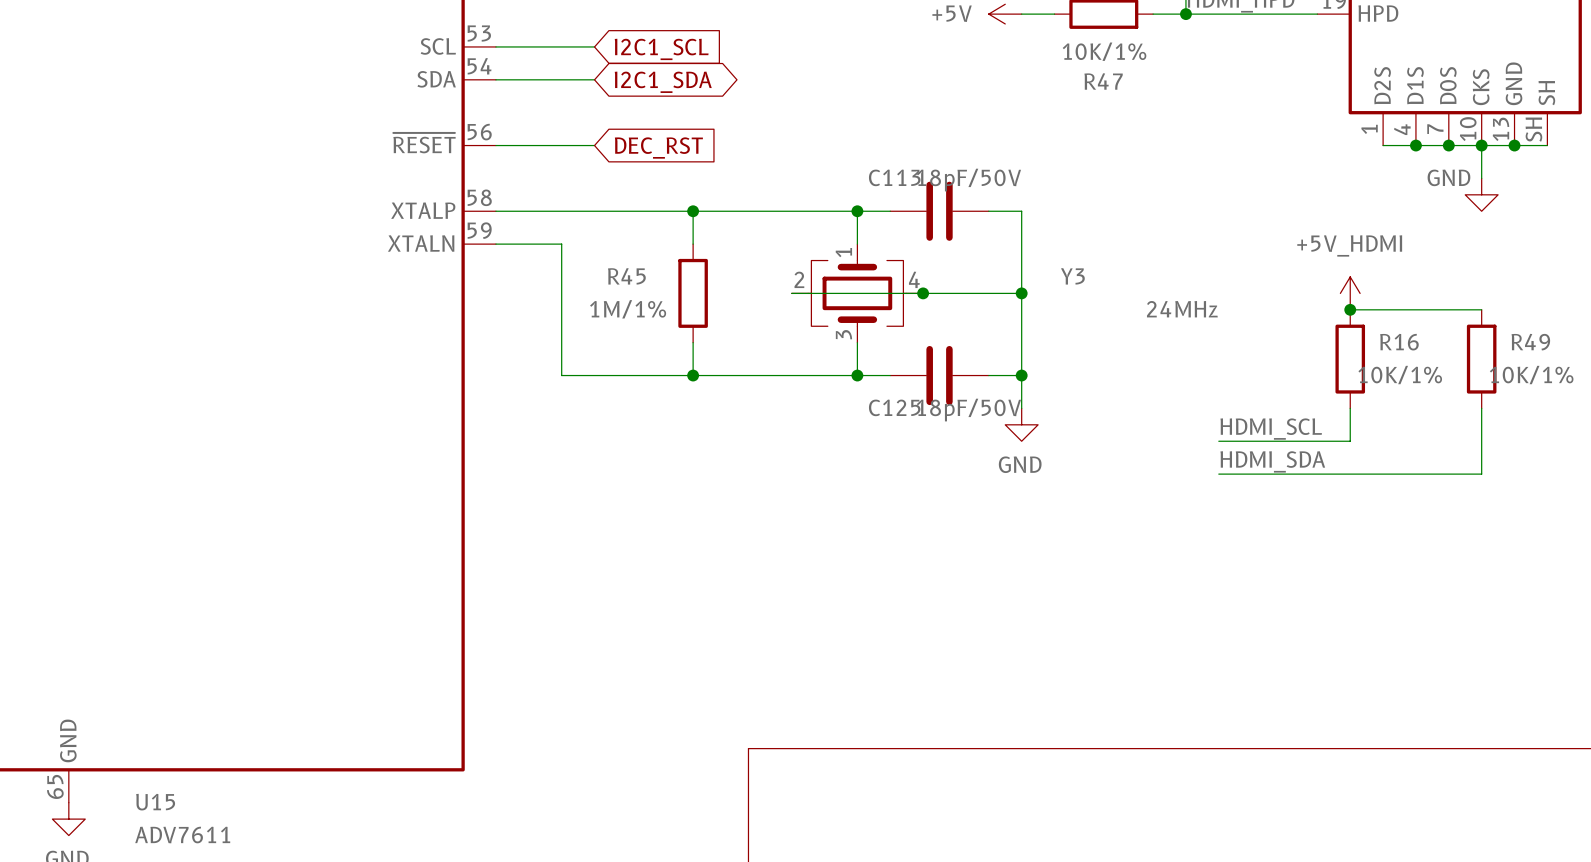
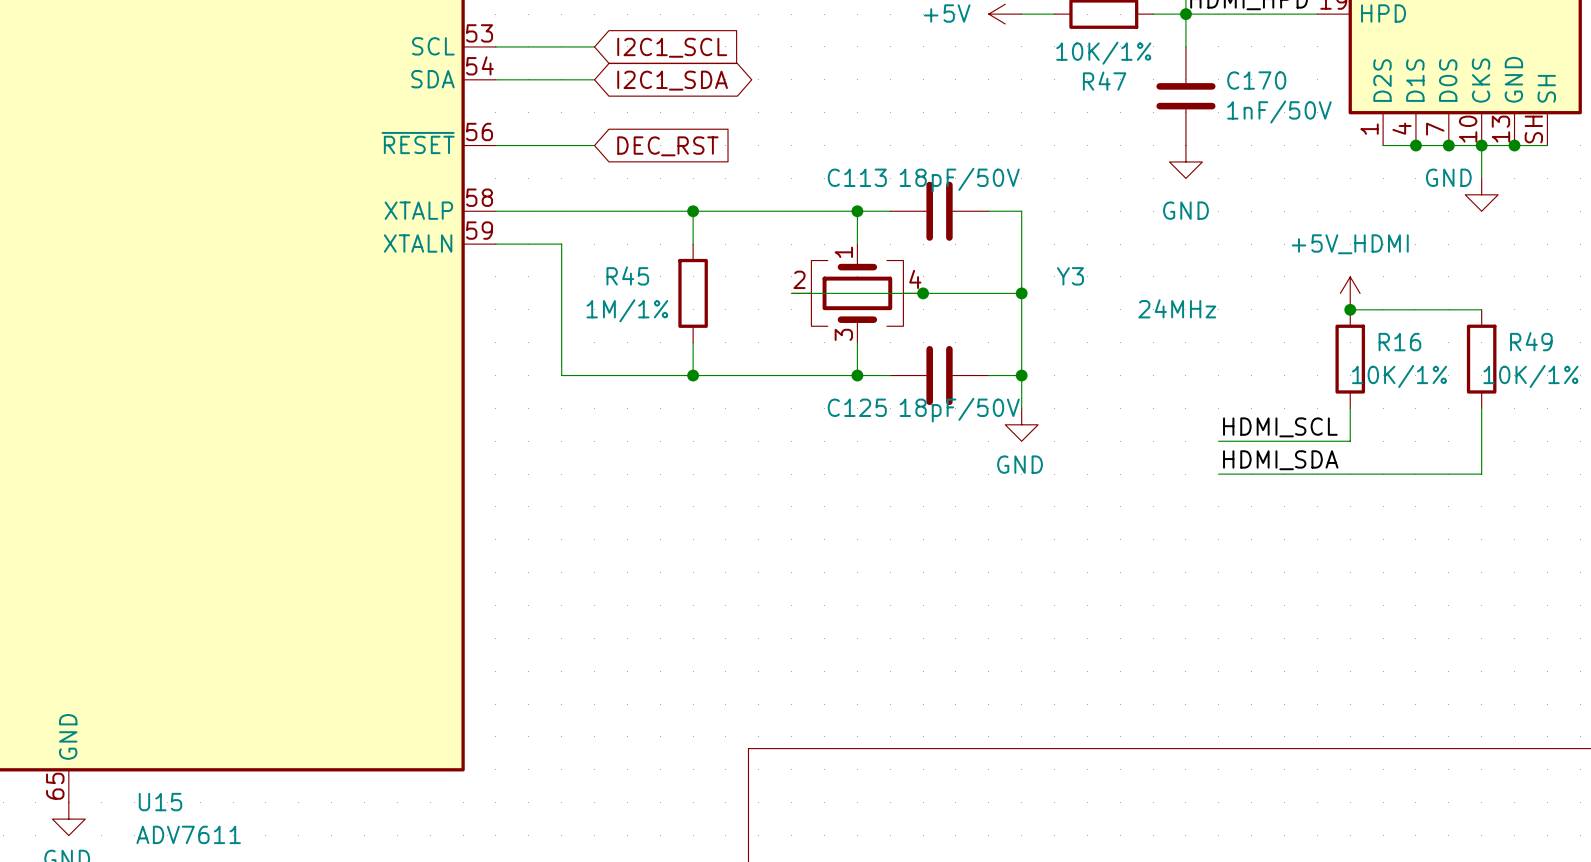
wire: none -> (1185, 14) (1185, 46)
C170: none -> 1nF/50V (1185, 96)
power symbol: none -> GND (1185, 161)
C113 name position: C113 (894, 177) -> C113 (857, 177)
C125 name position: C125 (894, 407) -> C125 (857, 407)

